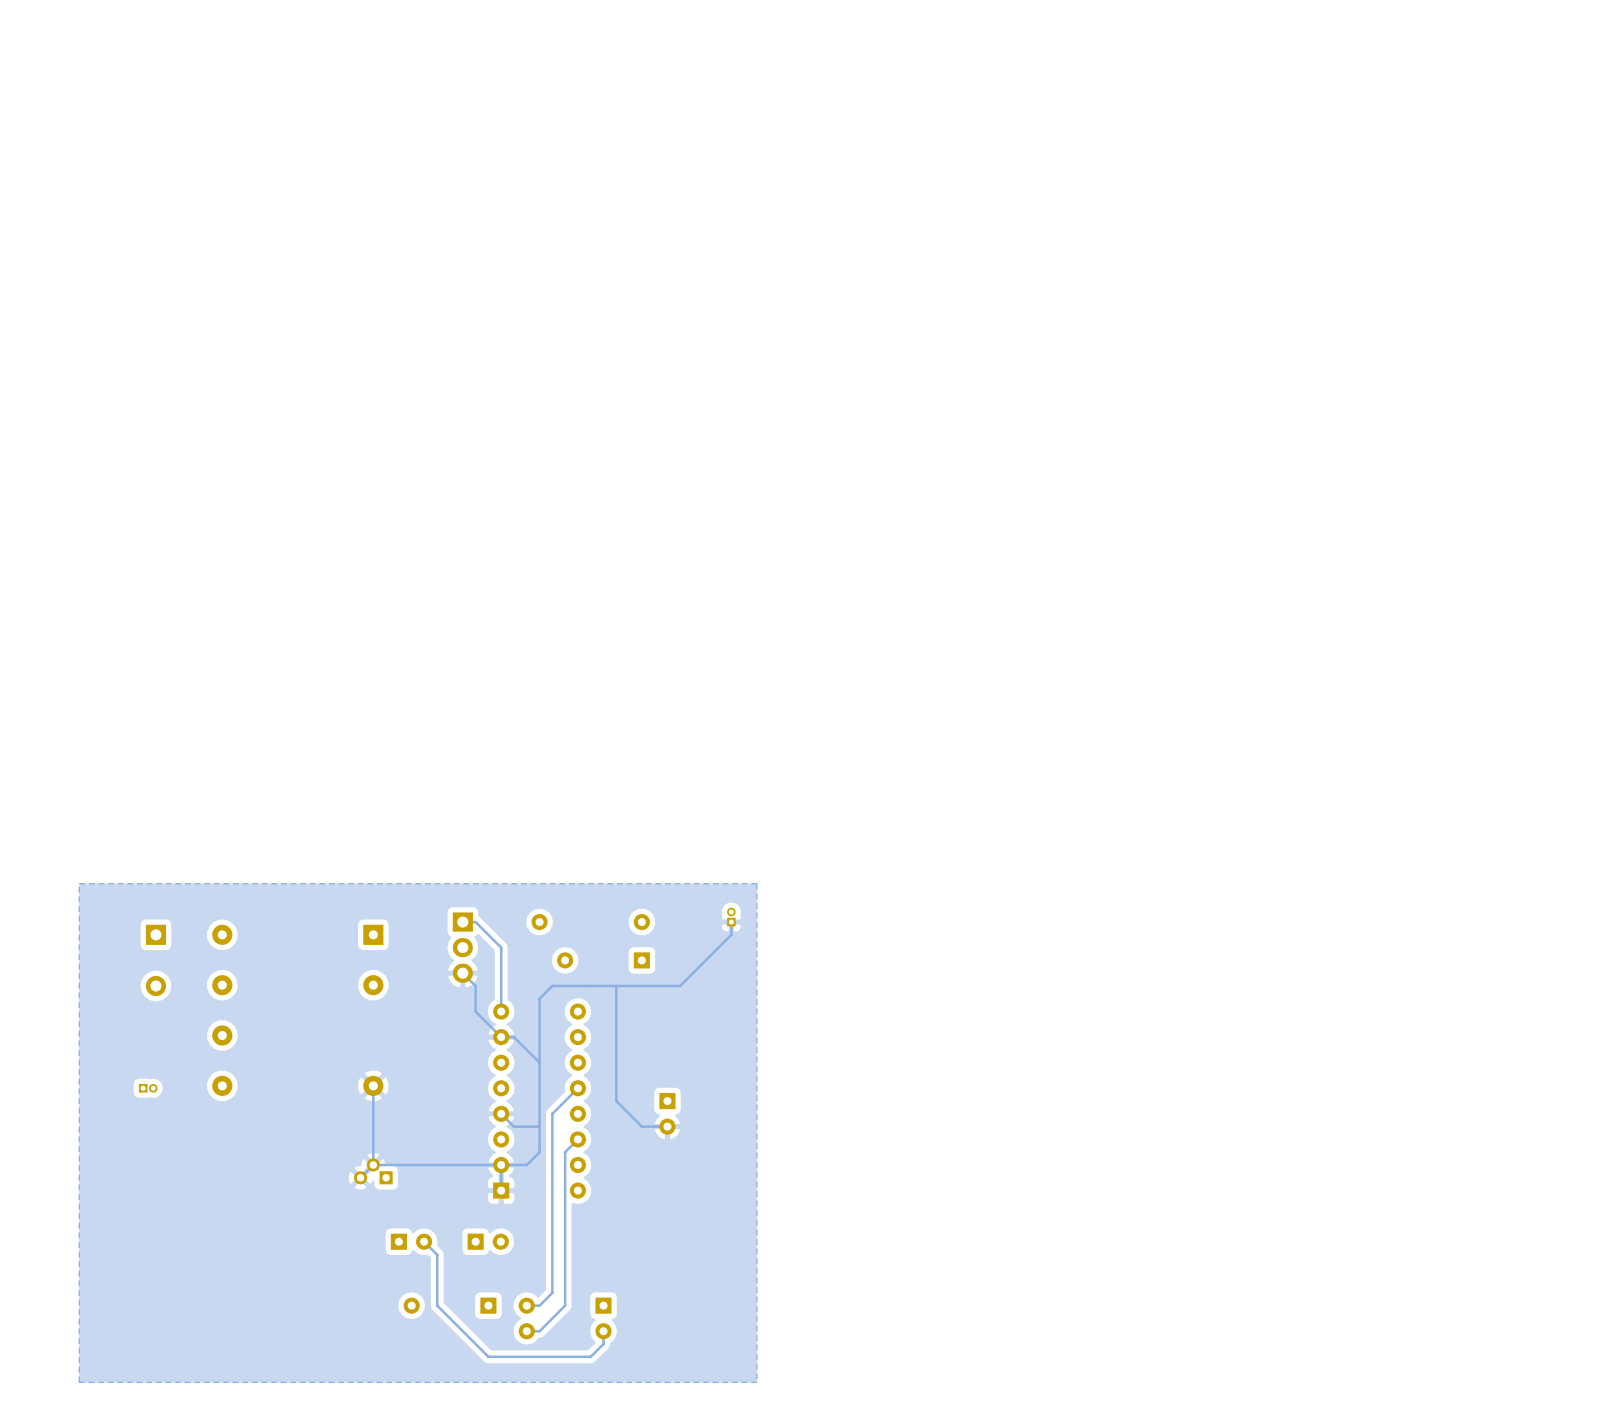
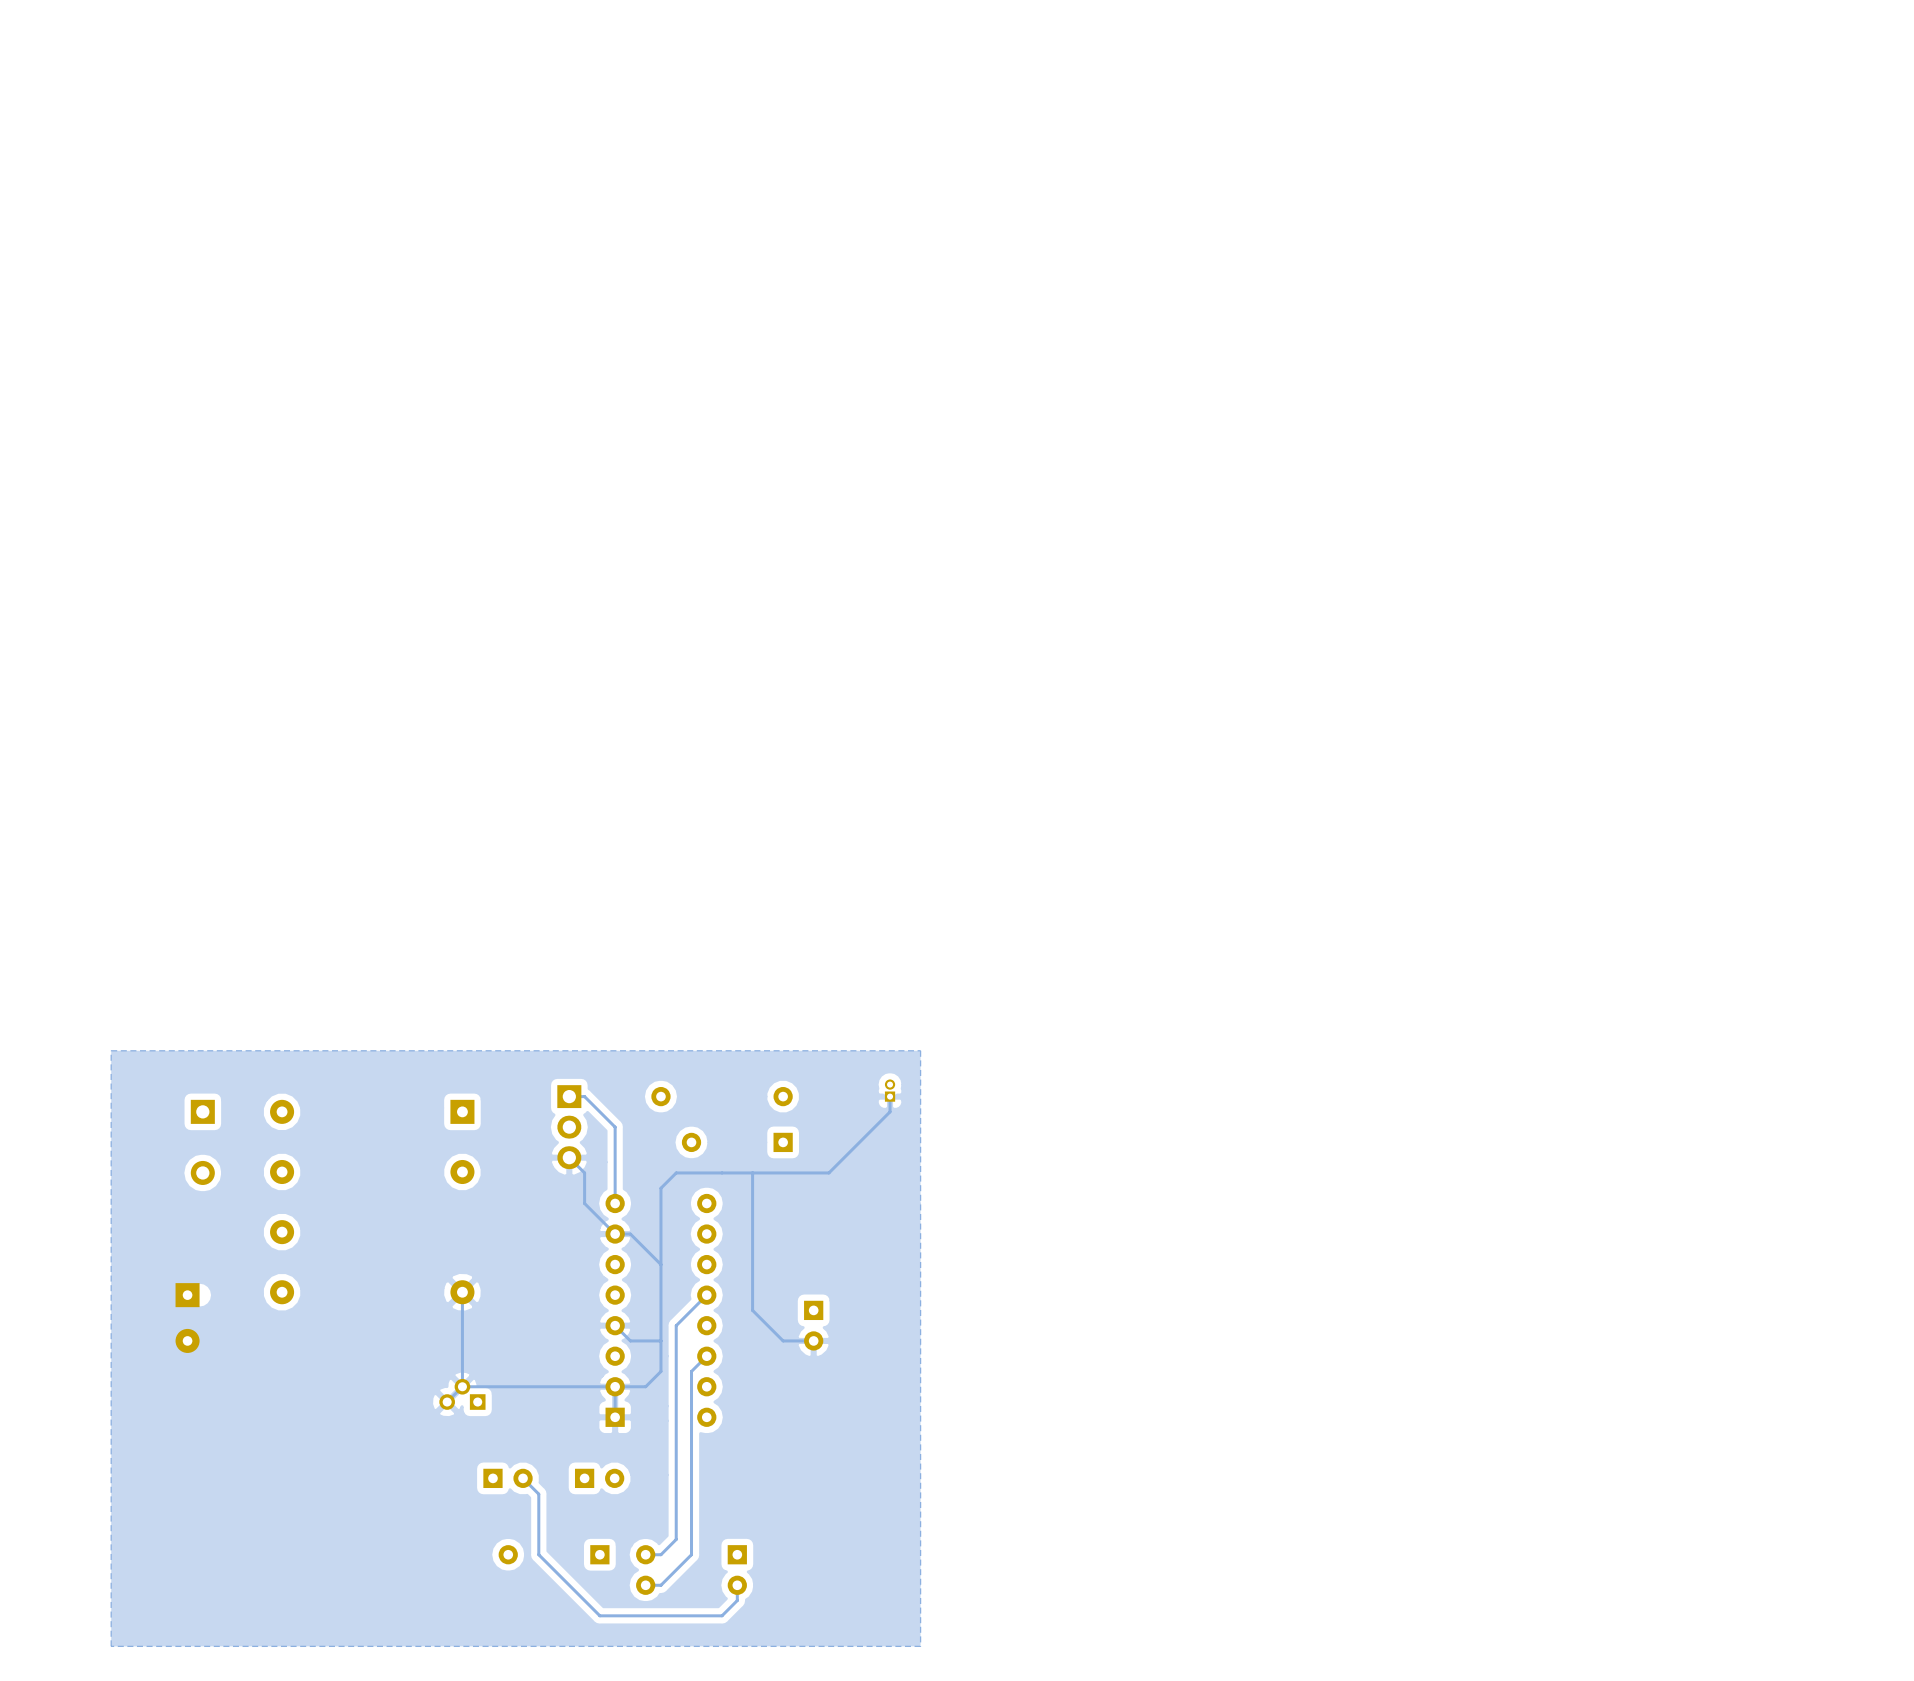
part: (148, 1088) -> none
part: none -> (187, 1318)

